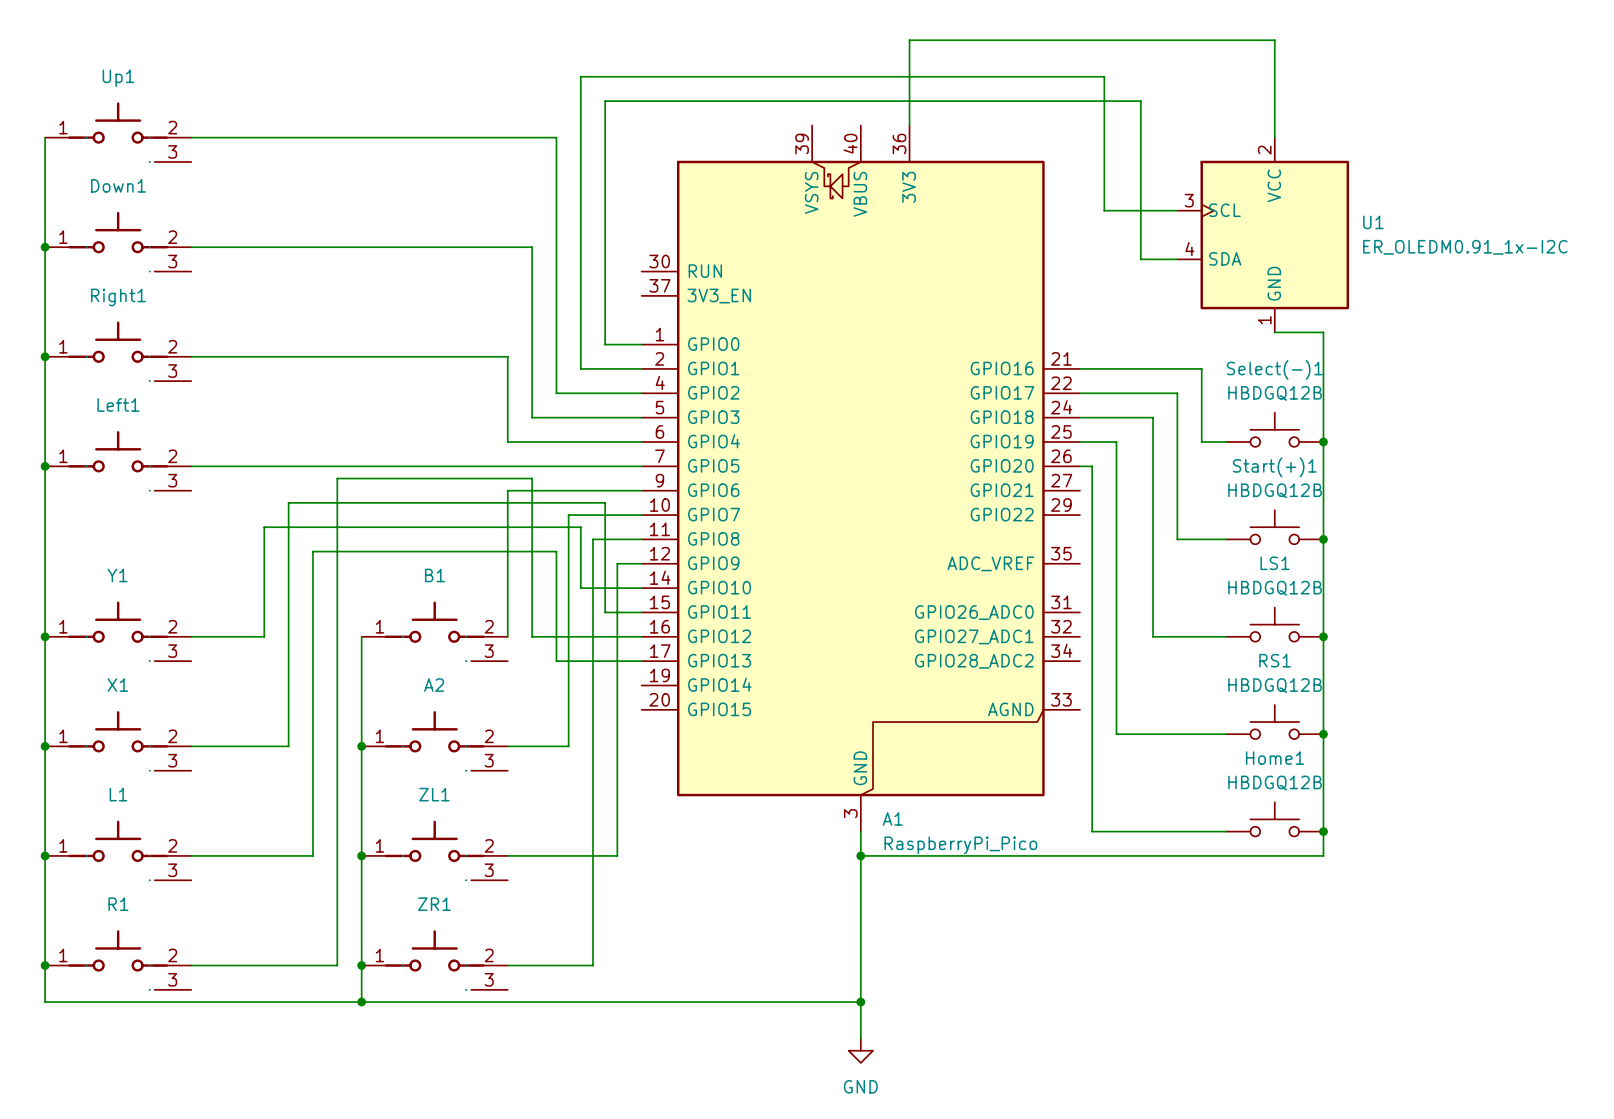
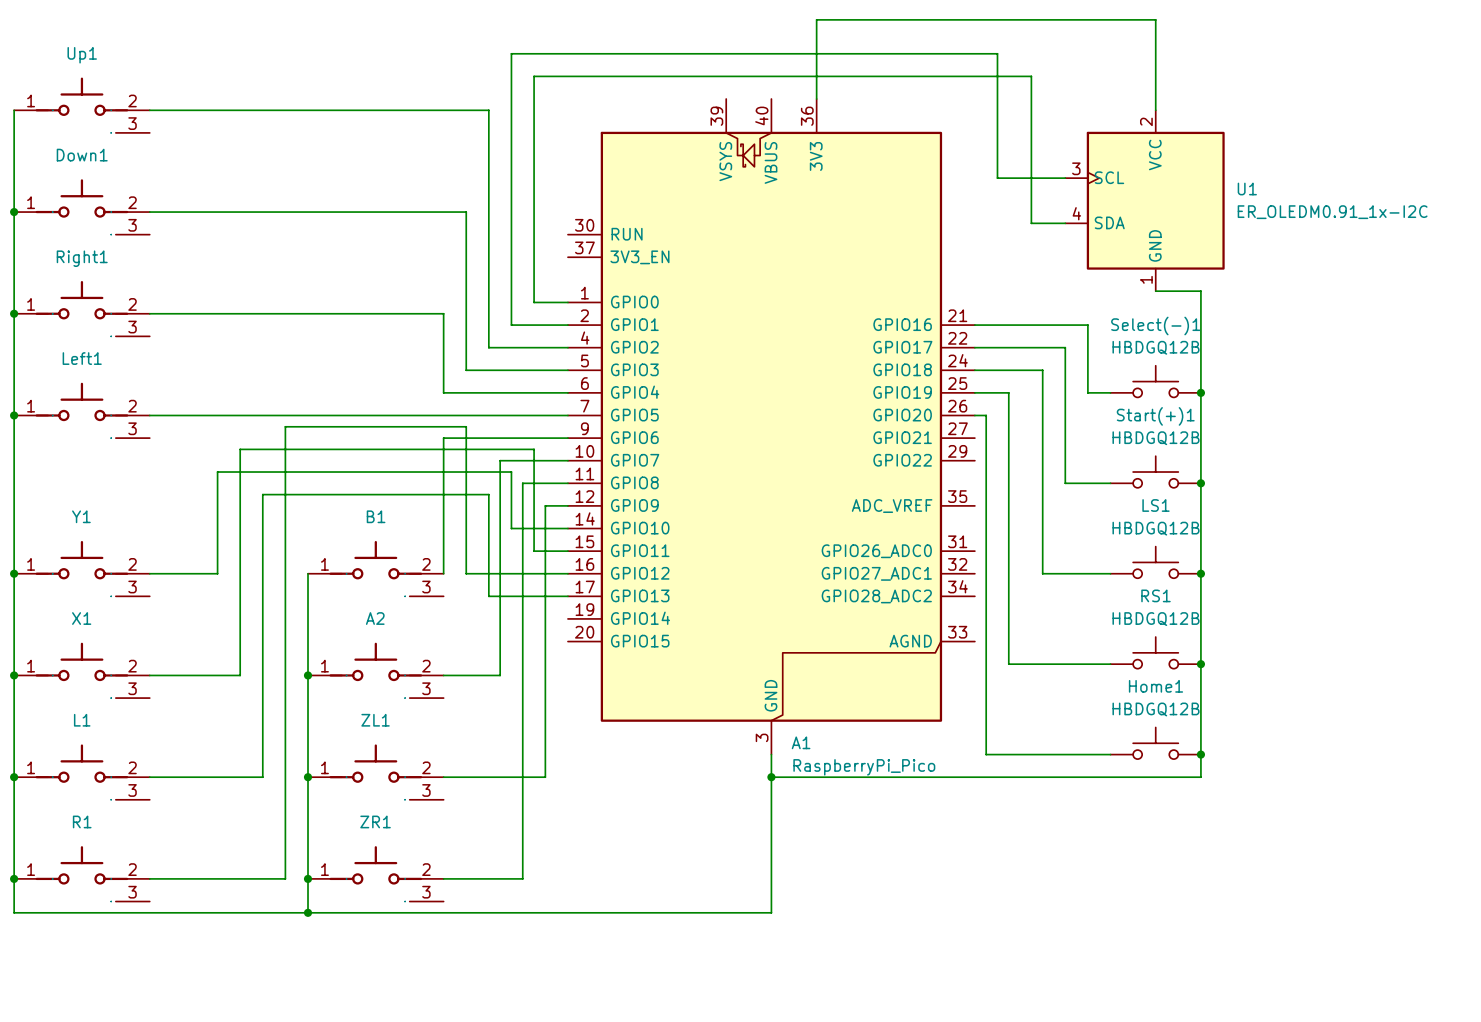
wire: (860, 1002) (860, 1038) -> none
junction: (860, 1002) -> none
power symbol: GND (860, 1050) -> none

